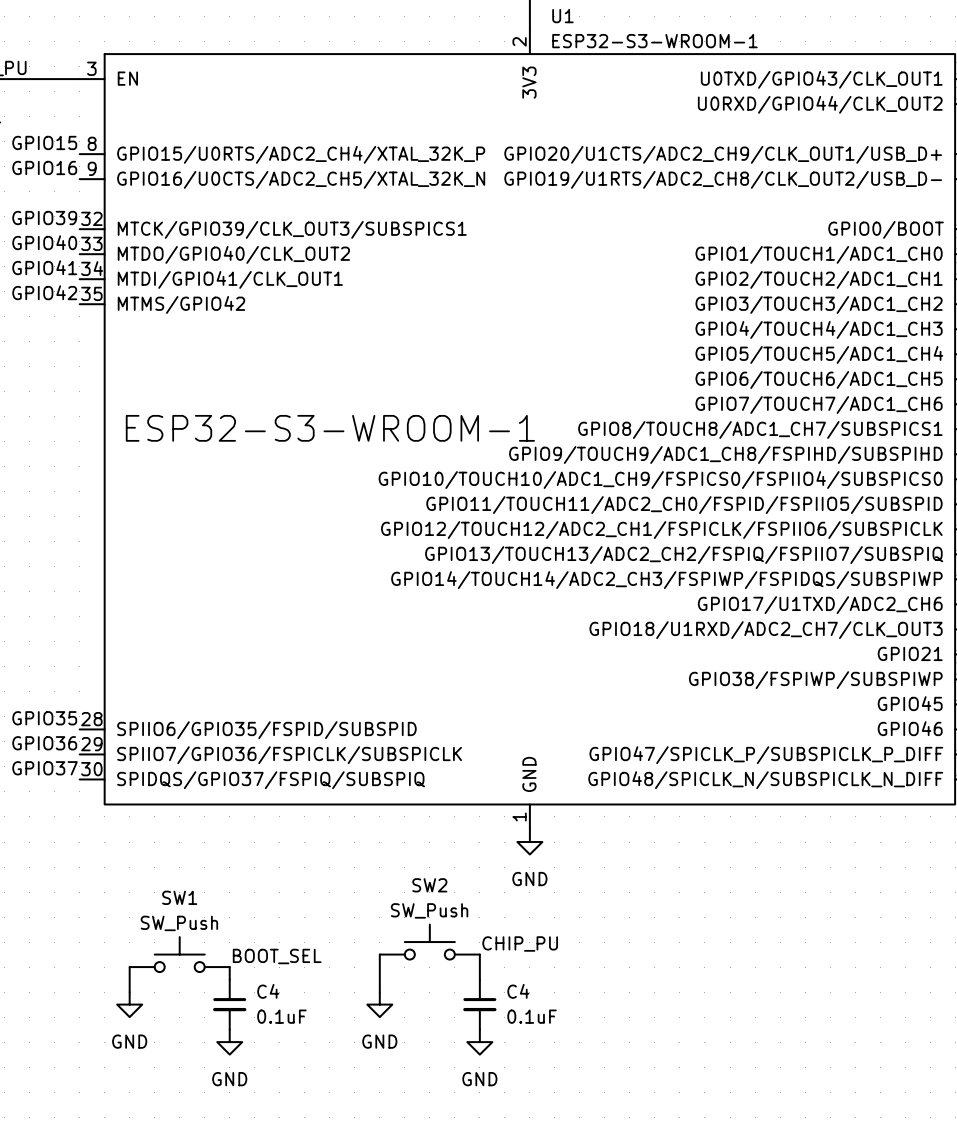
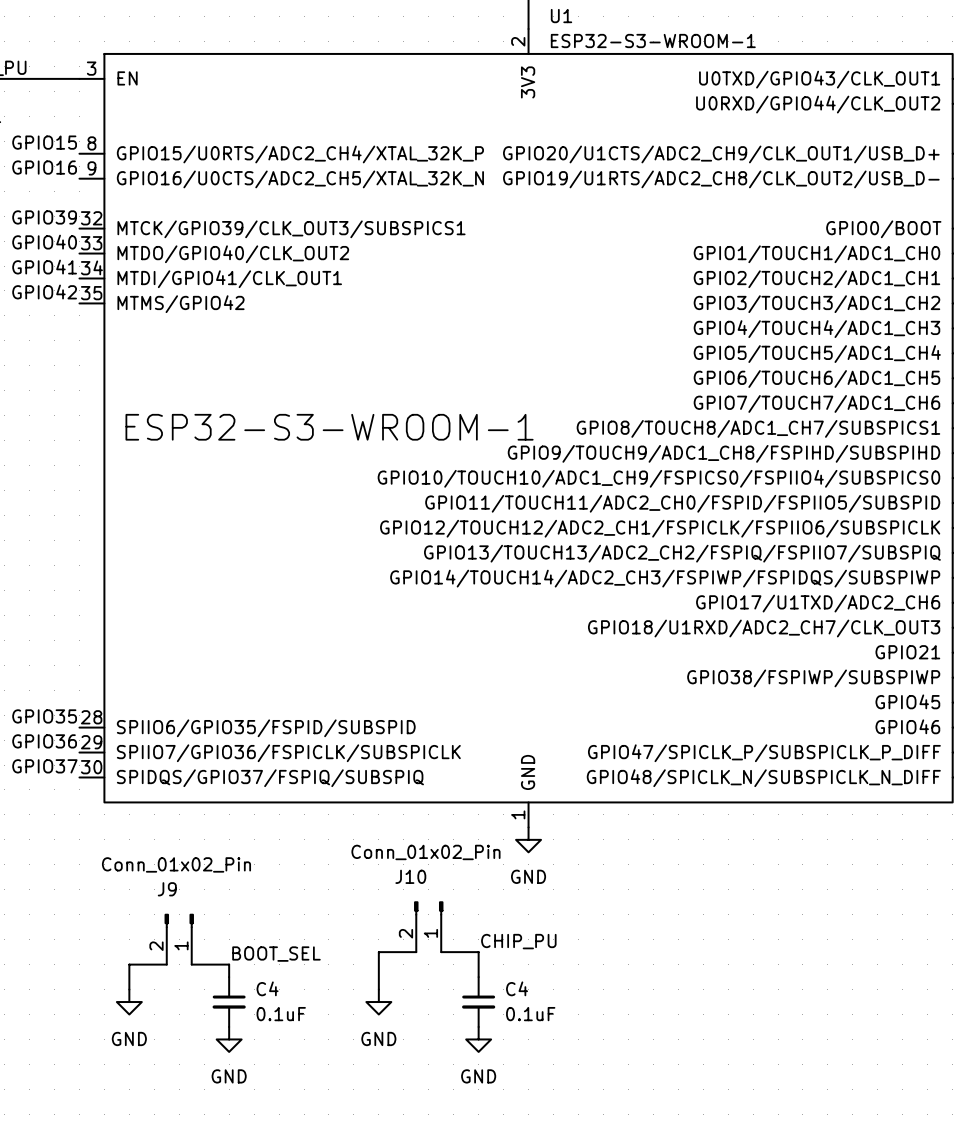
J10: none -> Conn_01x02_Pin (428, 926)
J9: none -> Conn_01x02_Pin (179, 939)
SW2: SW_Push (429, 942) -> none
SW1: SW_Push (179, 954) -> none

